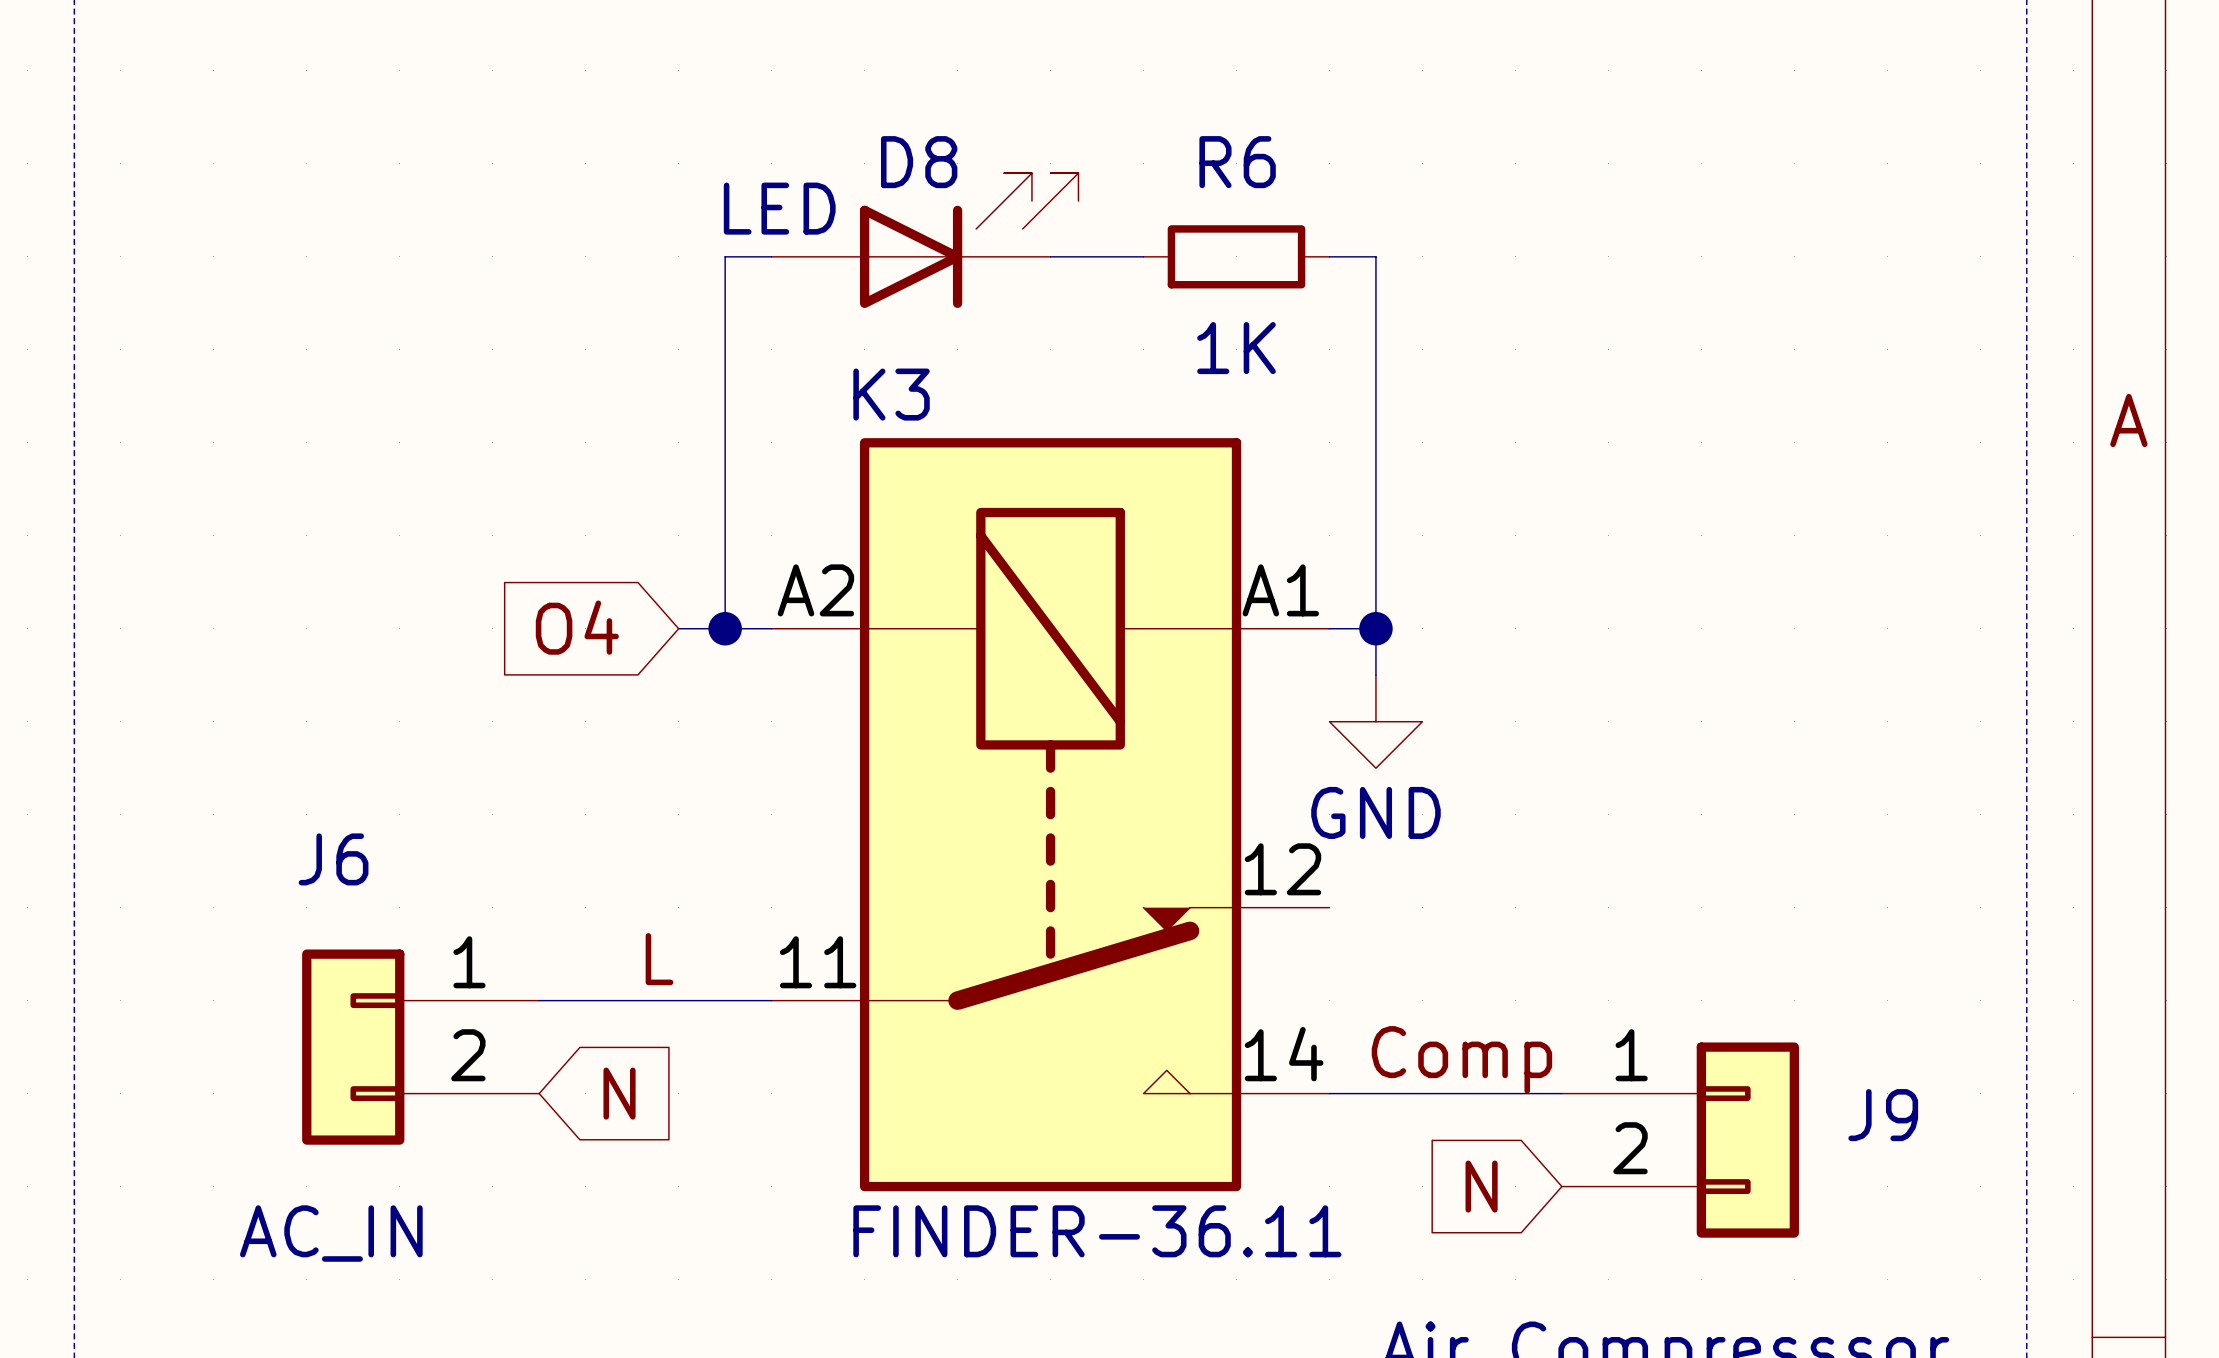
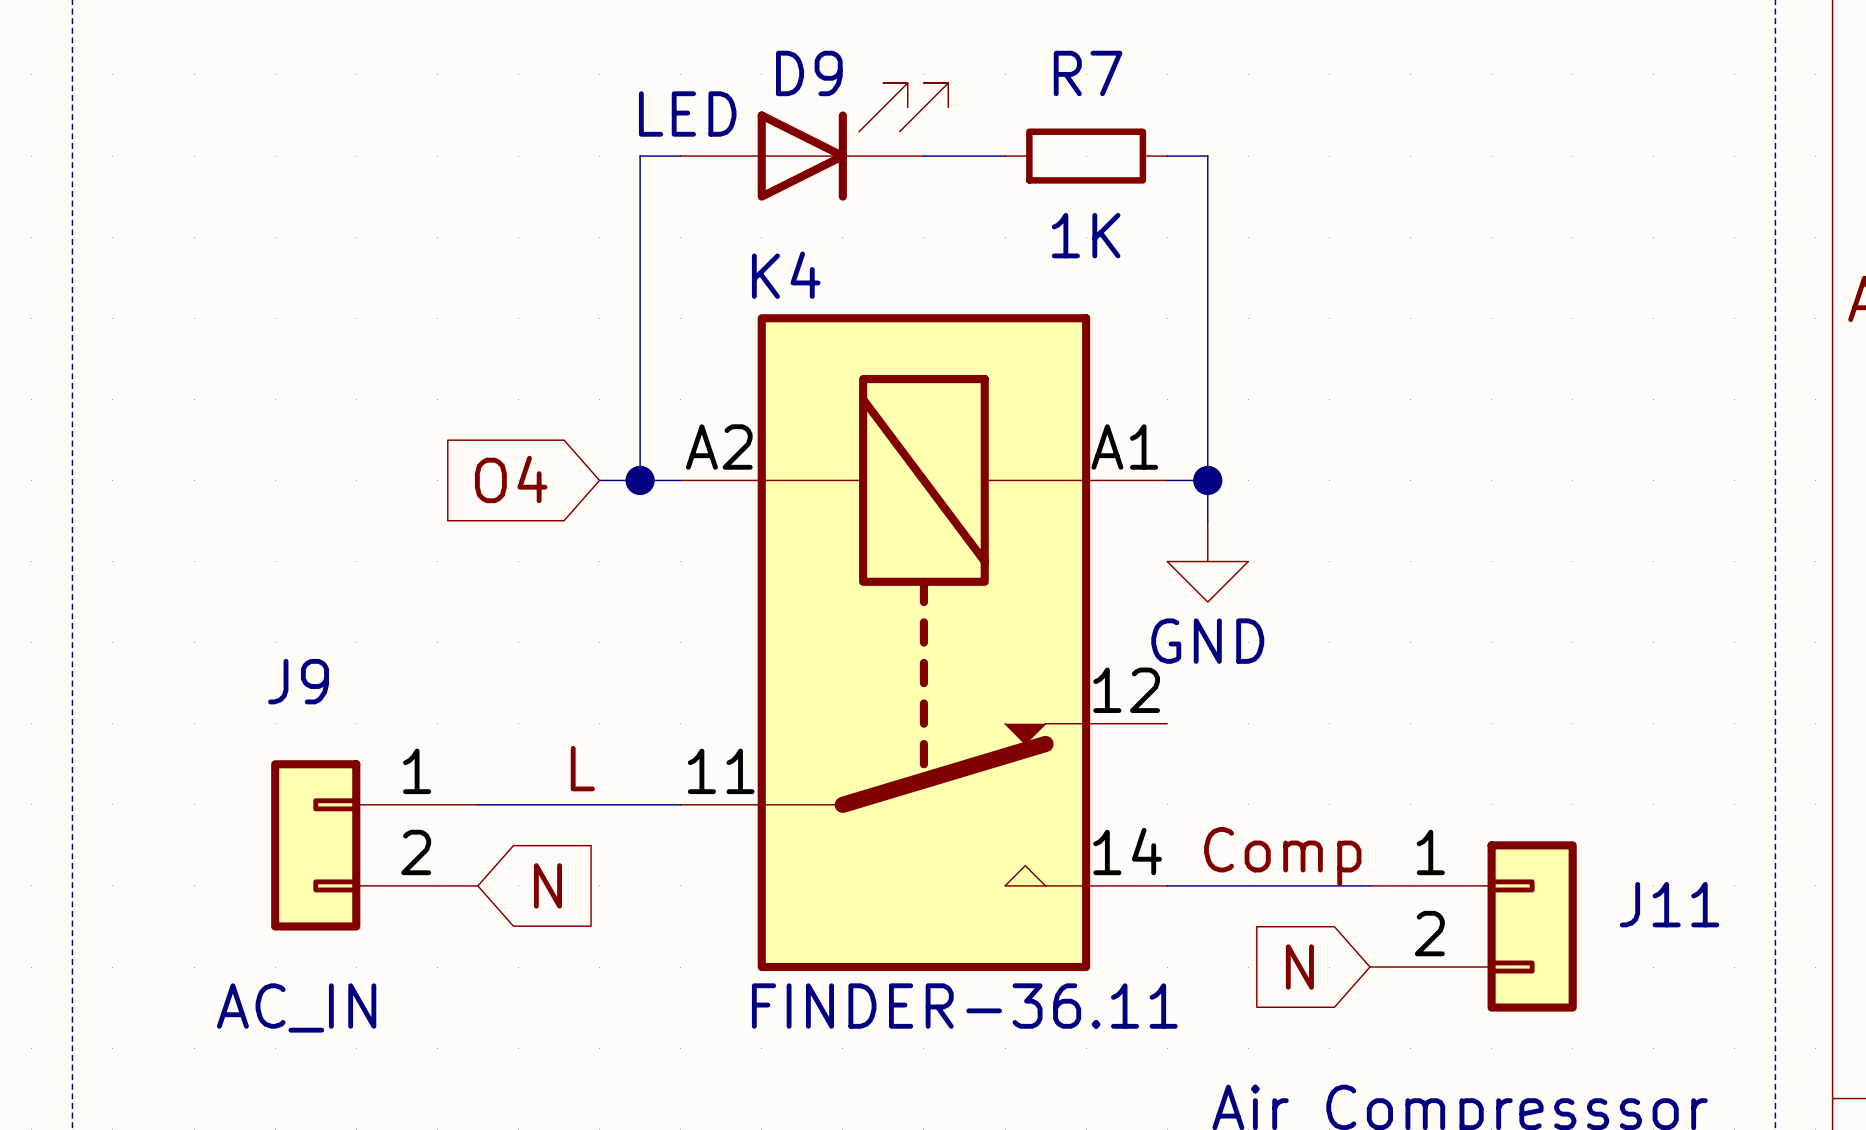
D8 name: D8 (919, 162) -> D9 (809, 73)
R6 name: R6 (1237, 162) -> R7 (1088, 73)
K3 name: K3 (891, 394) -> K4 (786, 275)
J6 name: J6 (333, 859) -> J9 (298, 681)
J9 name: J9 (1883, 1115) -> J11 (1669, 904)

